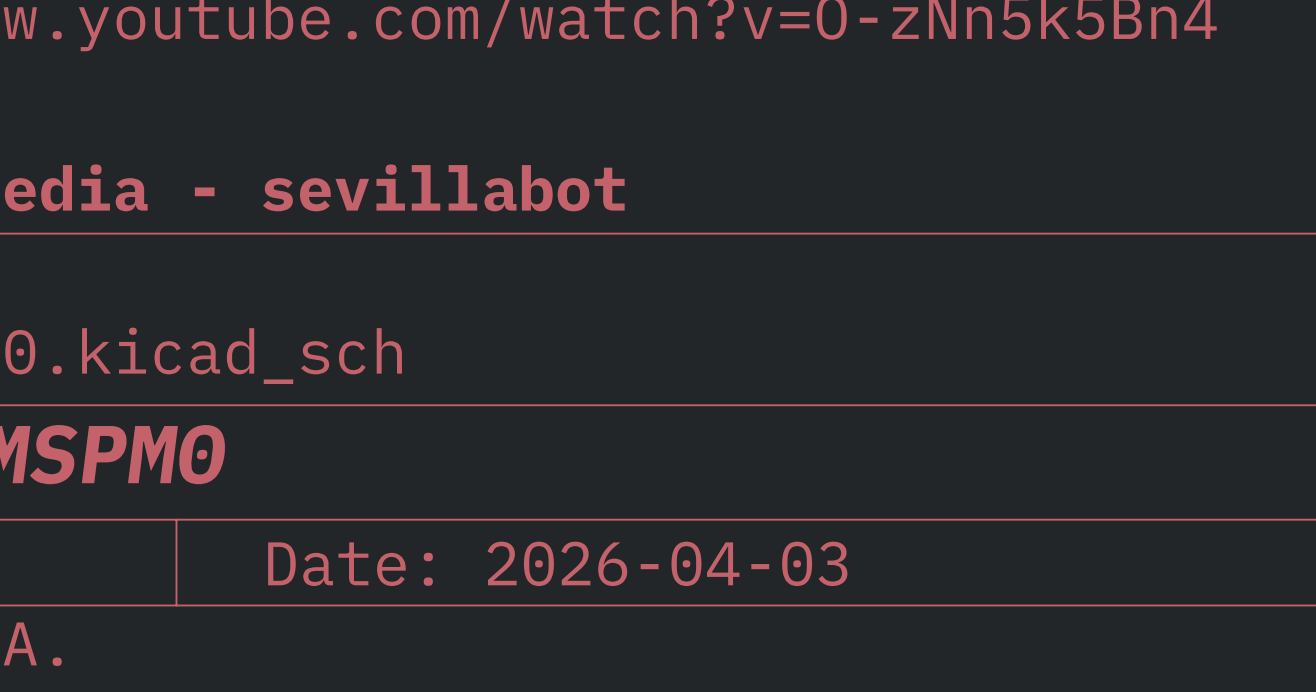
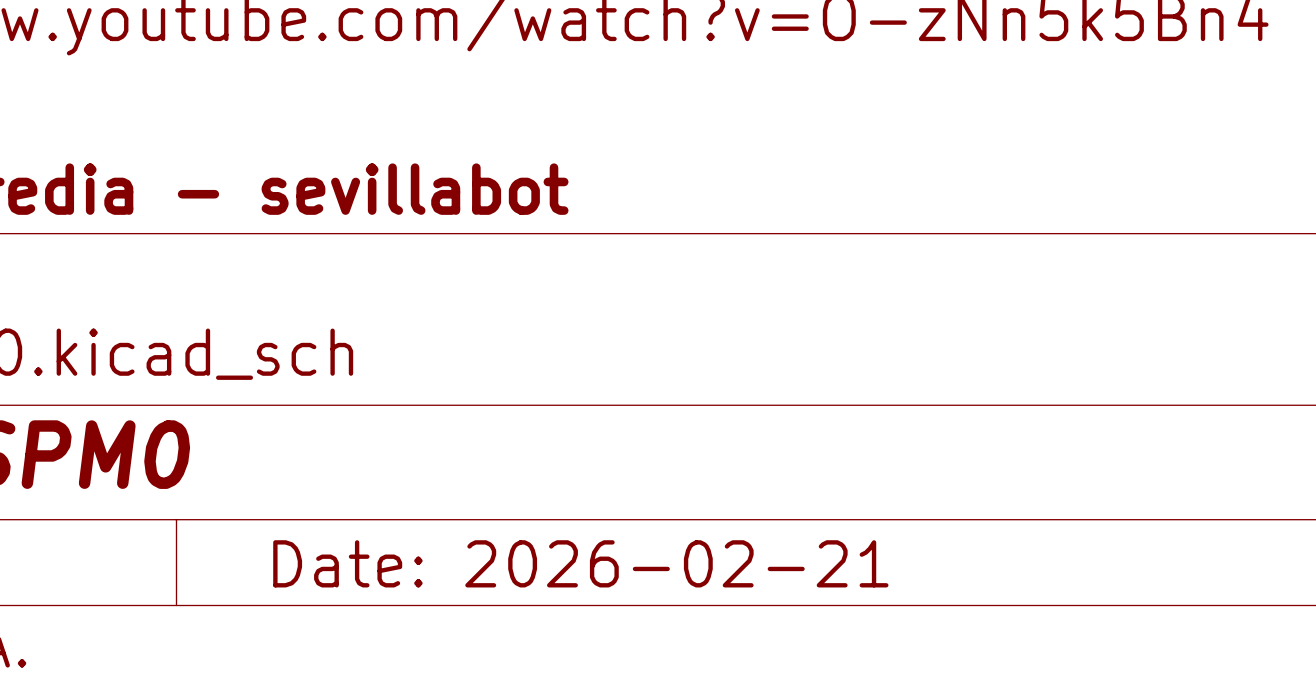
title block: Date: 2026-04-03 (557, 563) -> Date: 2026-02-21 (580, 563)

